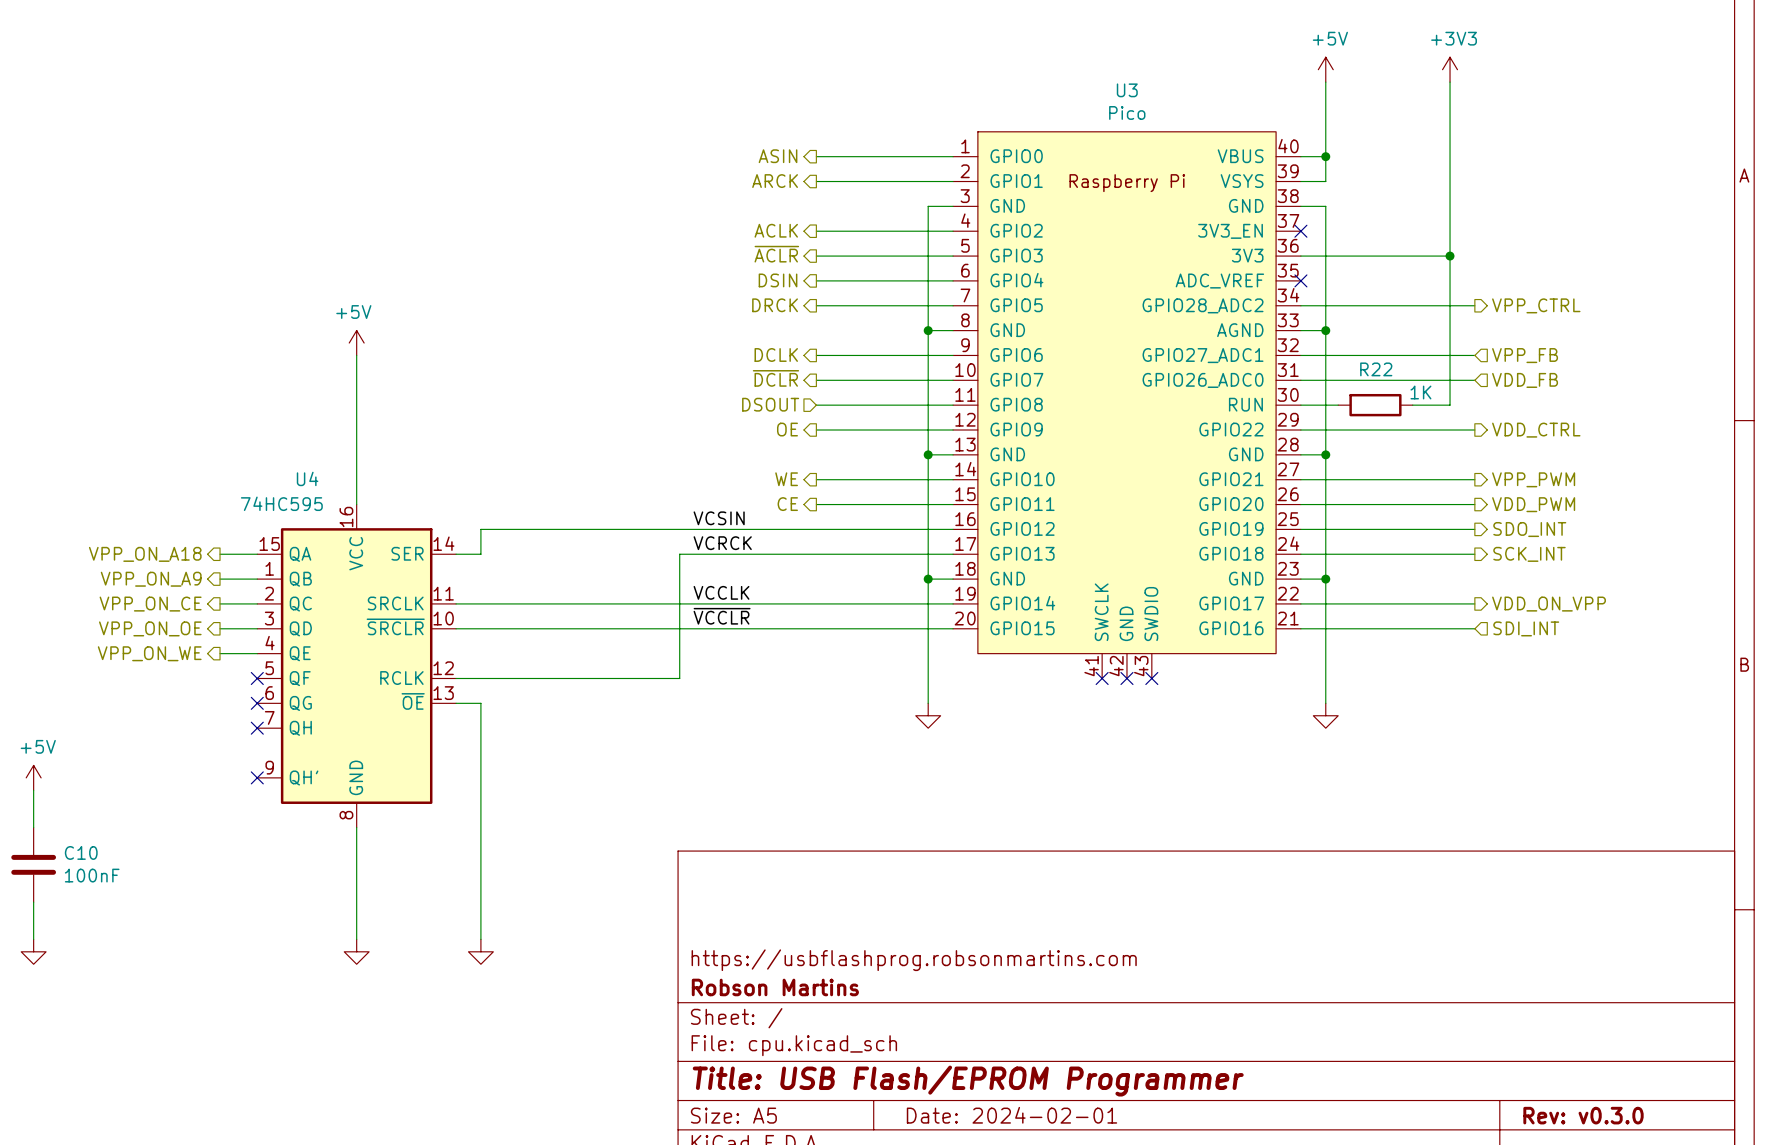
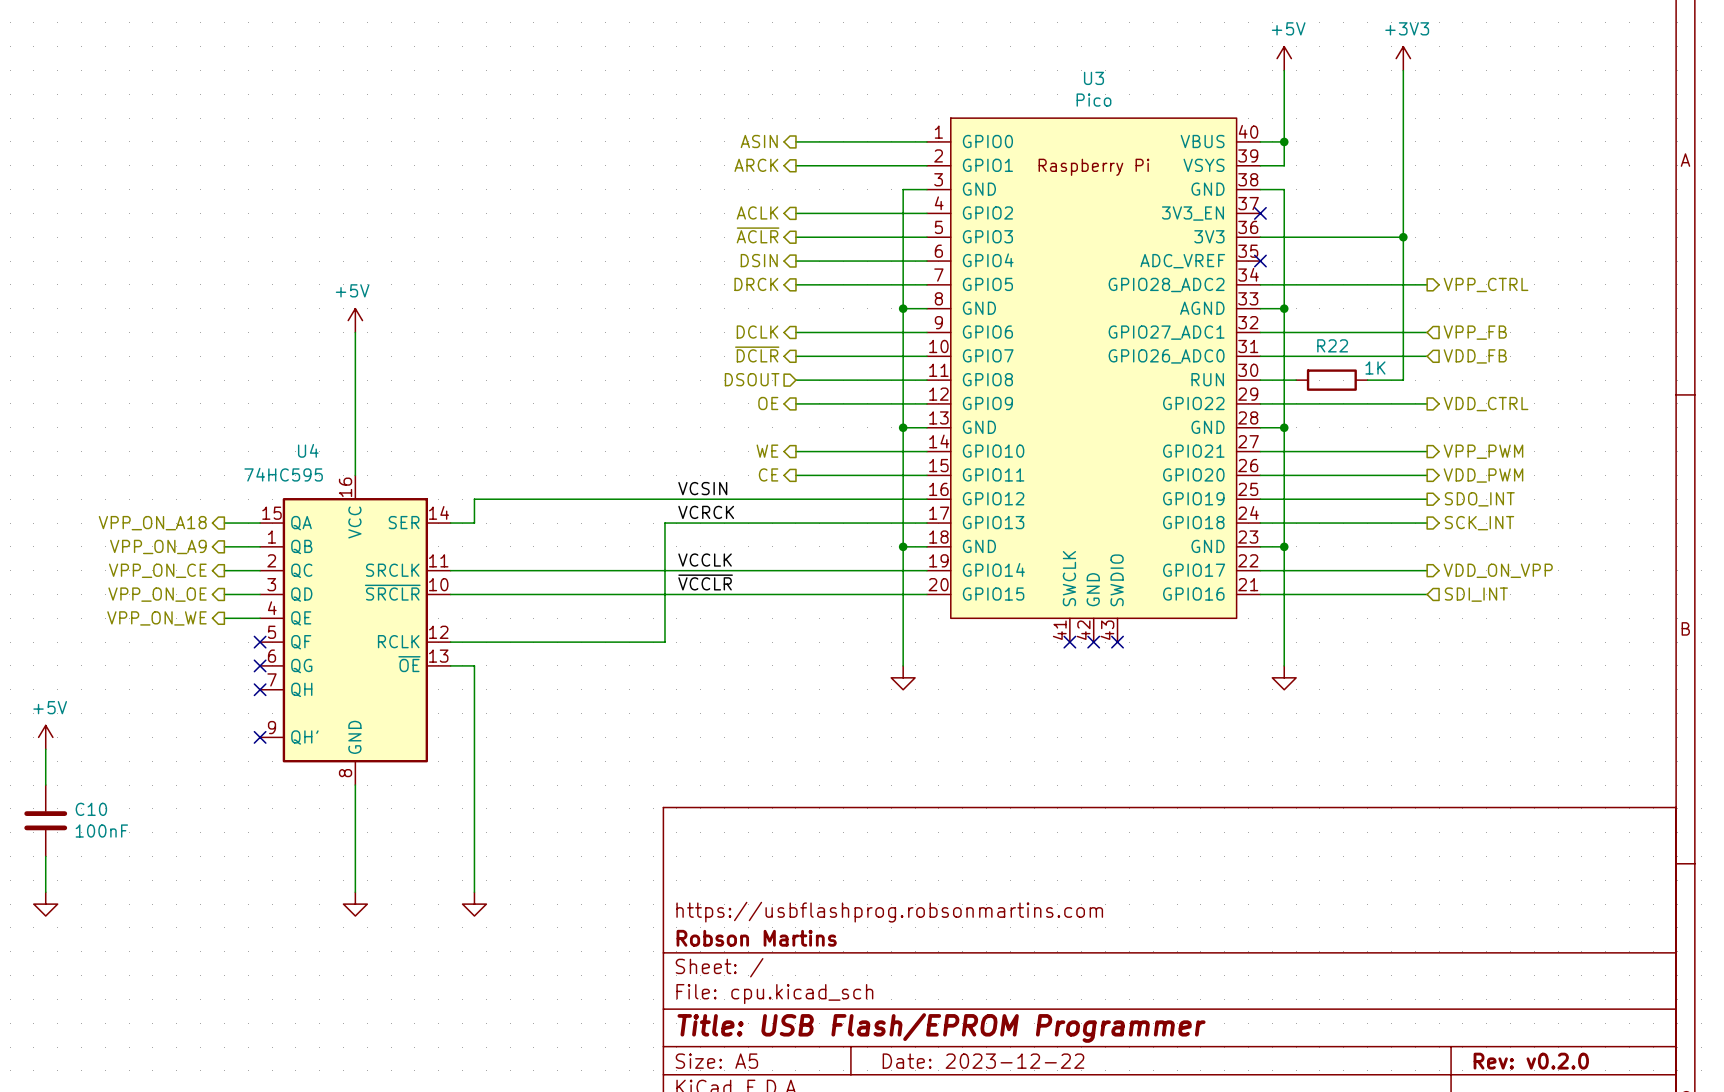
title block: Date: 2024-02-01 (1011, 1115) -> Date: 2023-12-22 (983, 1061)
title block: Rev: v0.3.0 (1583, 1115) -> Rev: v0.2.0 (1531, 1061)

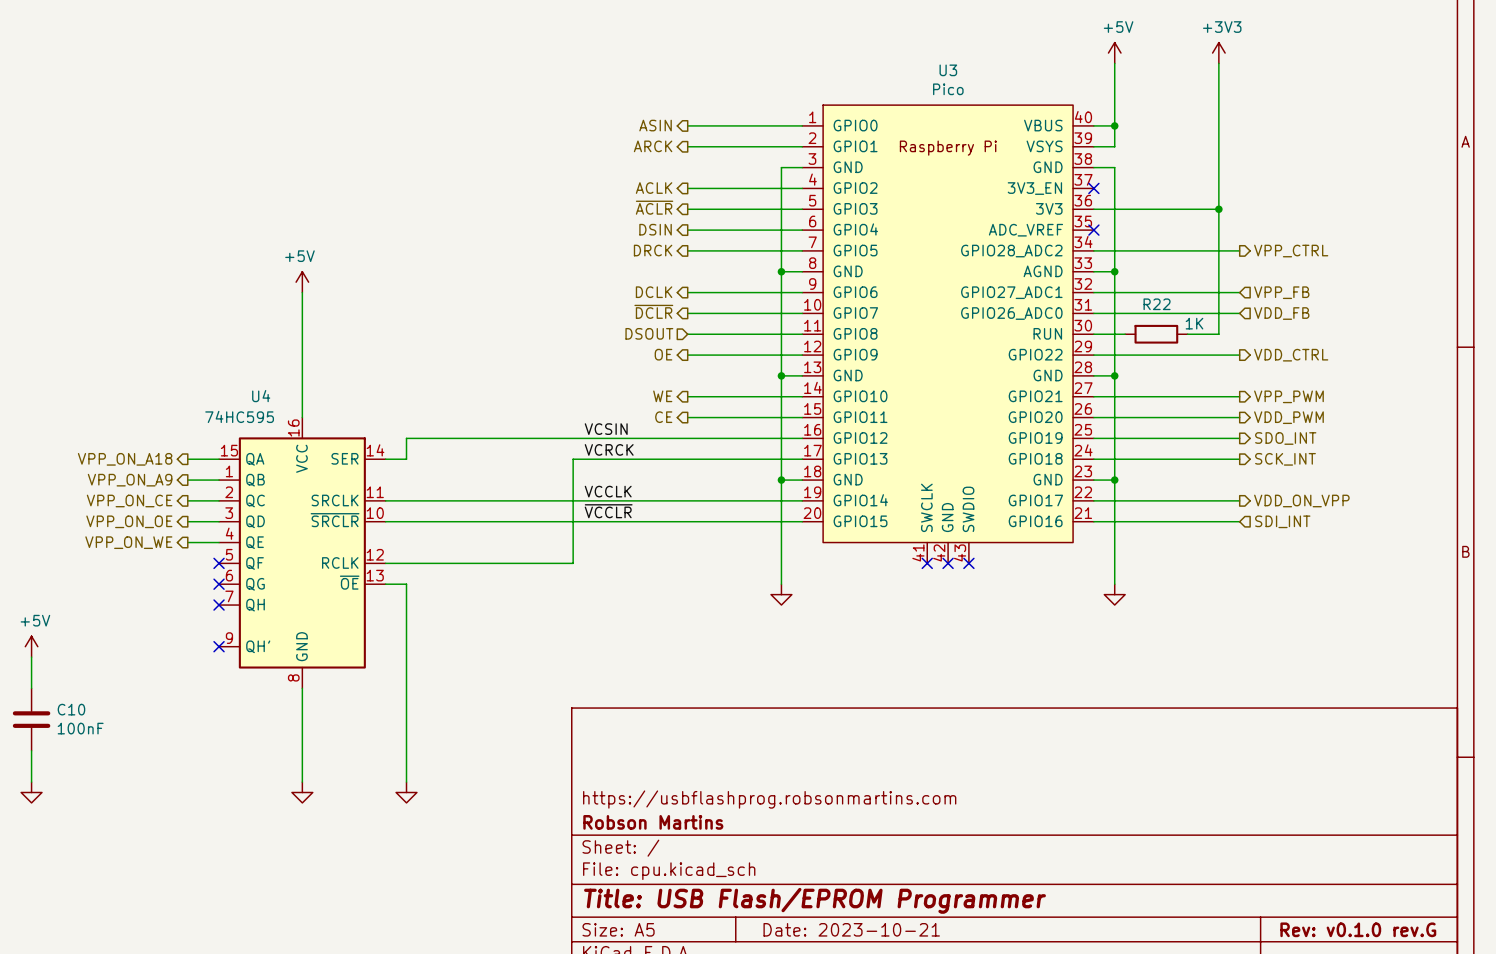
title block: Date: 2023-12-22 (983, 1061) -> Date: 2023-10-21 (851, 929)
title block: Rev: v0.2.0 (1531, 1061) -> Rev: v0.1.0 rev.G (1358, 929)

